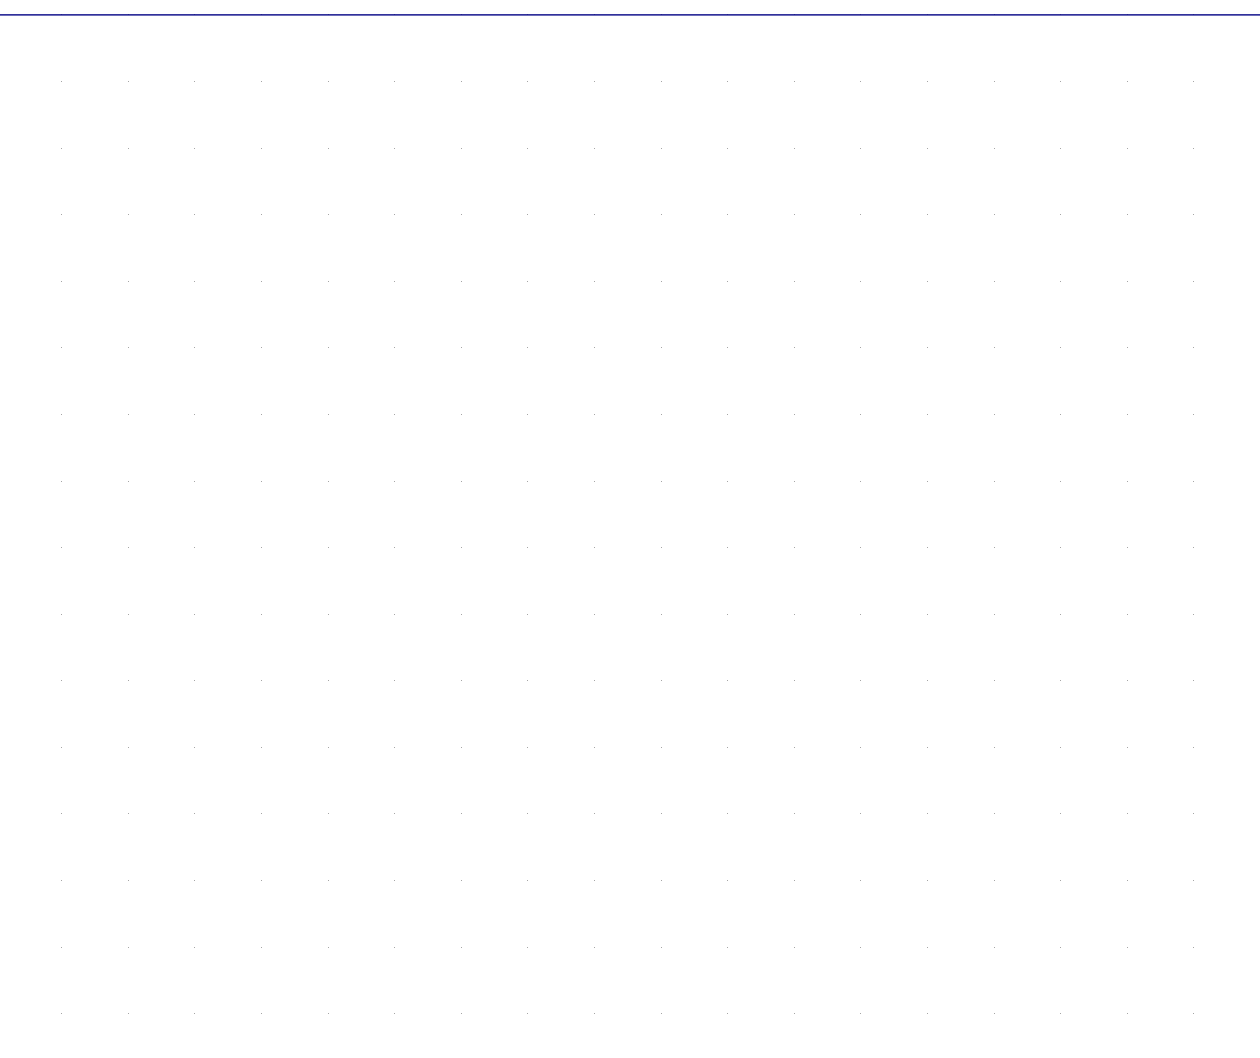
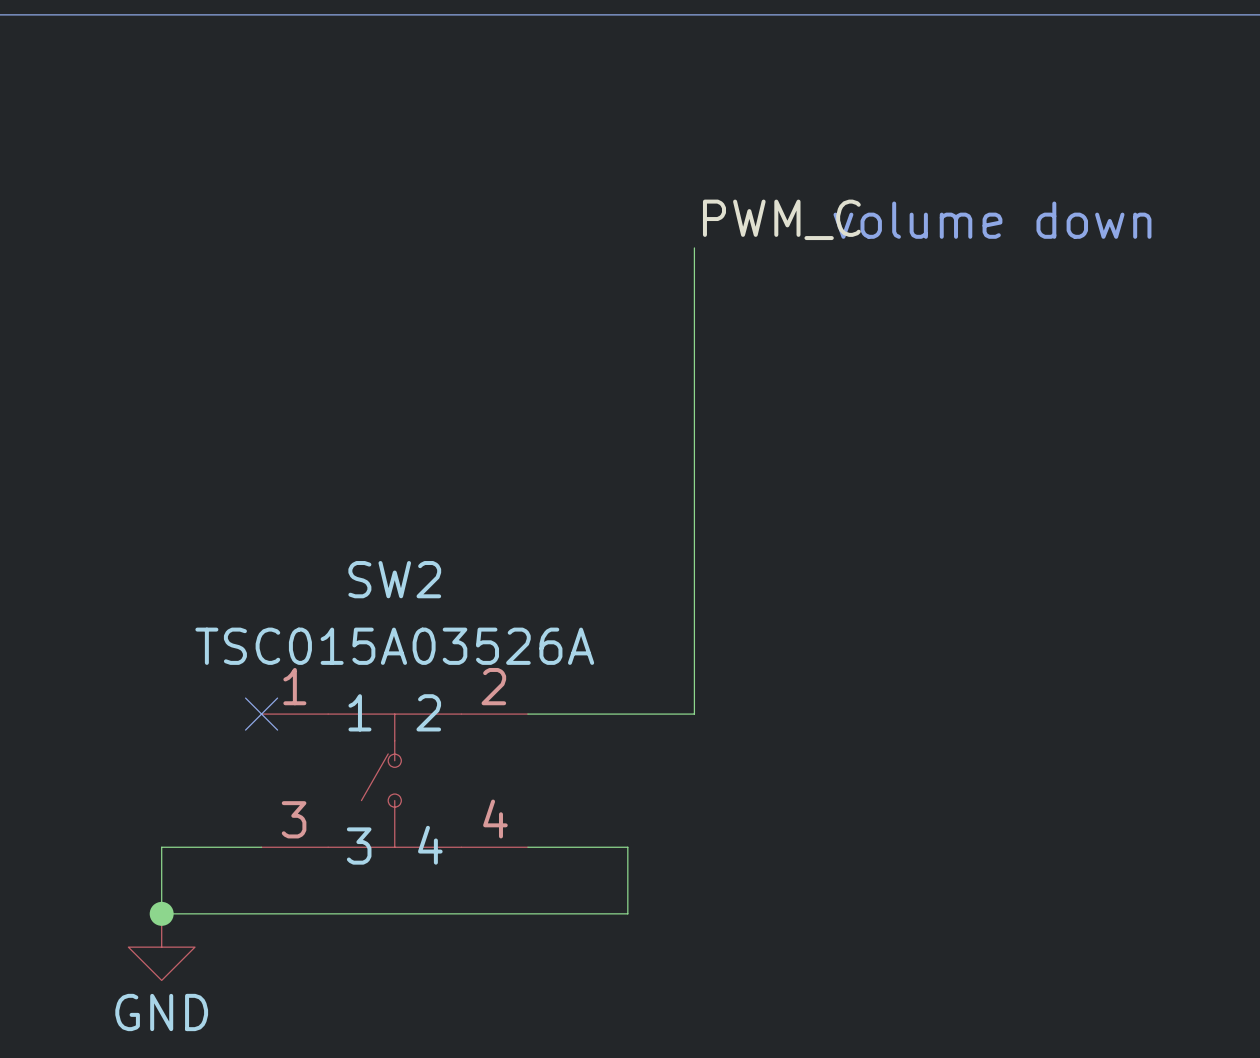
text: none -> volume down (992, 220)
label: none -> PWM_C (781, 219)
wire: none -> (694, 247) (694, 714) (527, 714)
no-connect mark: none -> (261, 714)
SW2: none -> TSC015A03526A (394, 780)
wire: none -> (261, 847) (161, 847) (161, 913) (627, 913) (627, 847) (527, 847)
junction: none -> (161, 913)
power symbol: none -> GND (161, 947)

